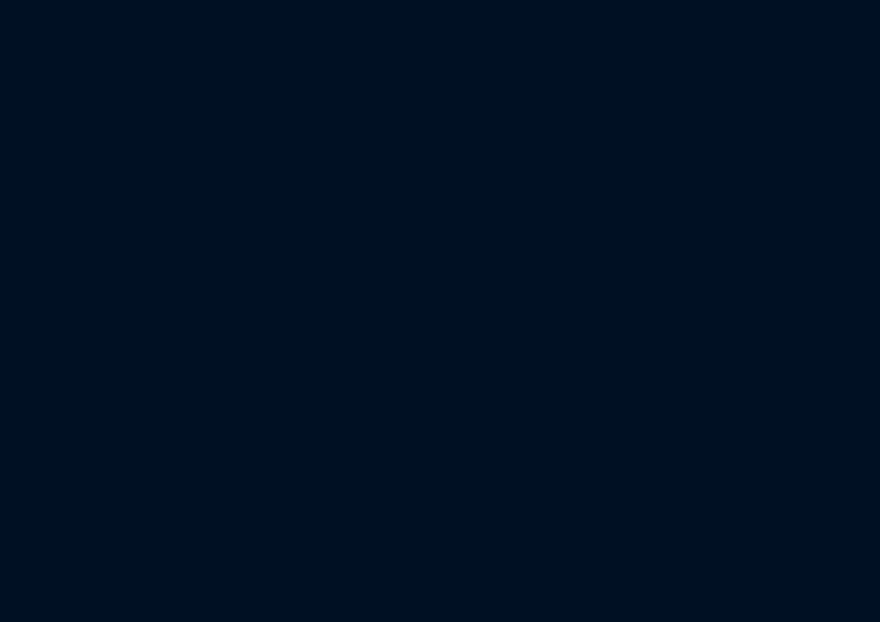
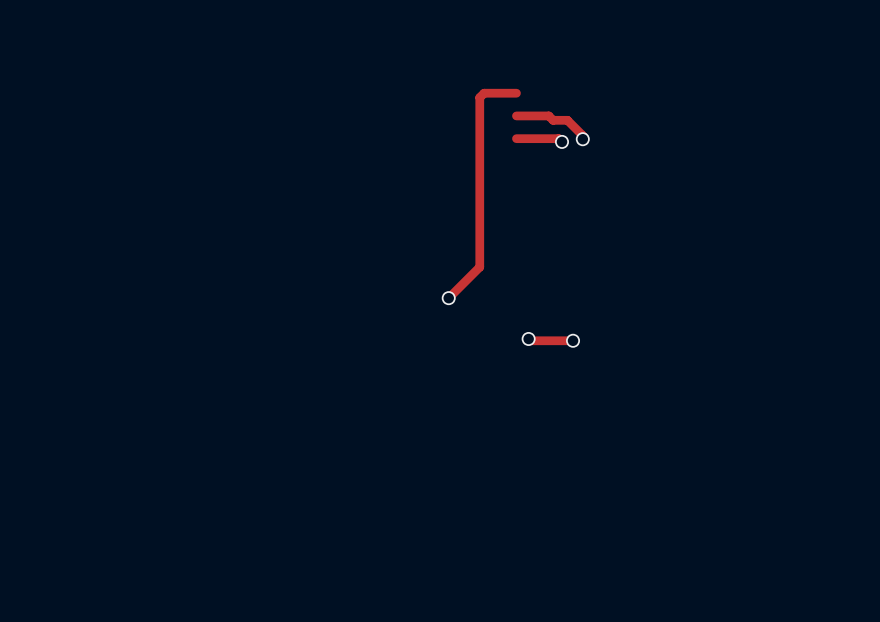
track: none -> (516, 93) (484, 93) (479, 97) (479, 267) (448, 298)
track: none -> (516, 115) (548, 115) (553, 120) (567, 120) (582, 135) (582, 139)
track: none -> (516, 138) (558, 138) (562, 141)
via: none -> (582, 139)
via: none -> (562, 141)
via: none -> (448, 298)
track: none -> (528, 338) (530, 340) (573, 340)
via: none -> (528, 338)
via: none -> (573, 340)

